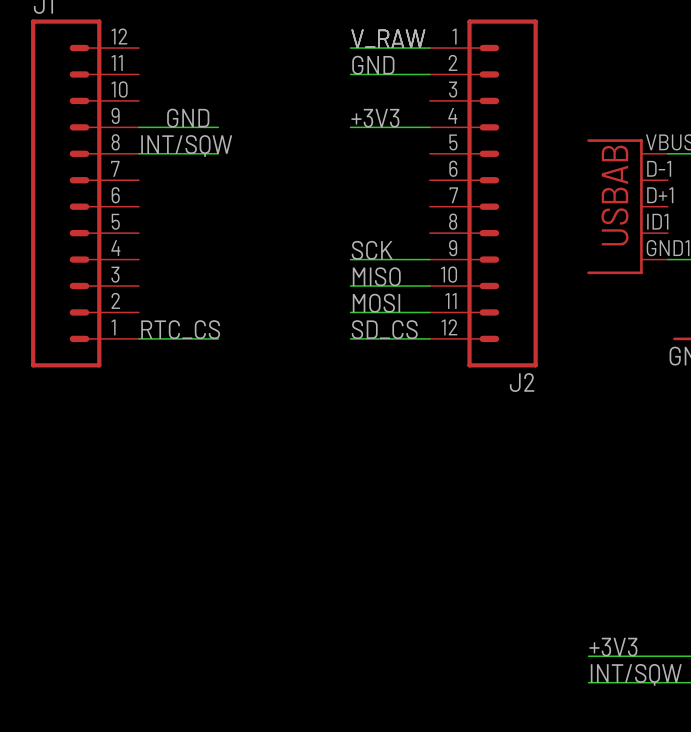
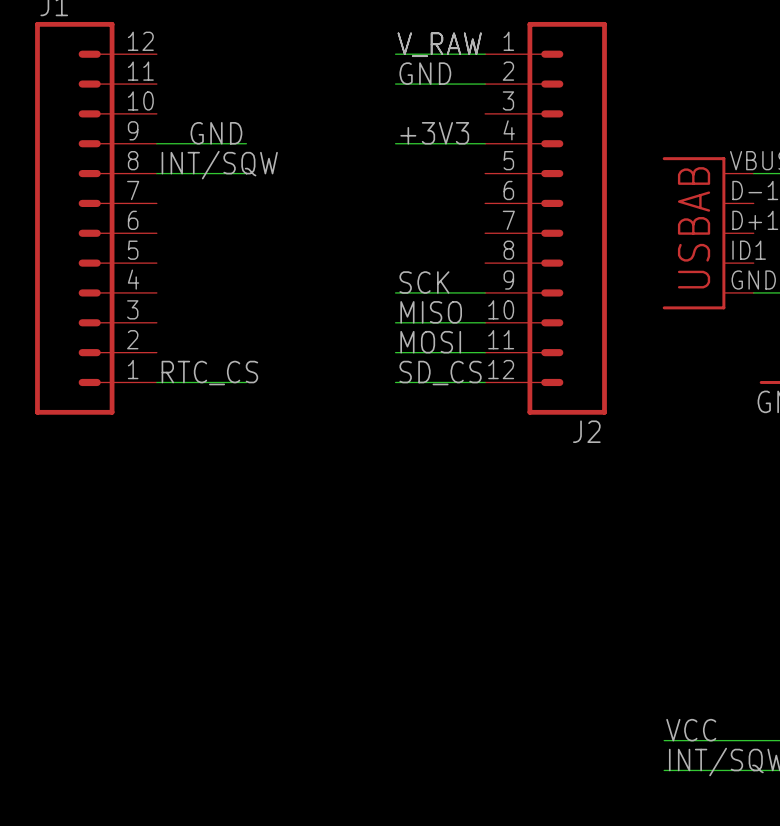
label: +3V3 (613, 647) -> VCC (691, 730)

